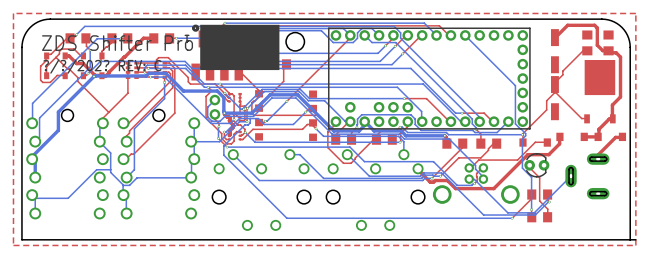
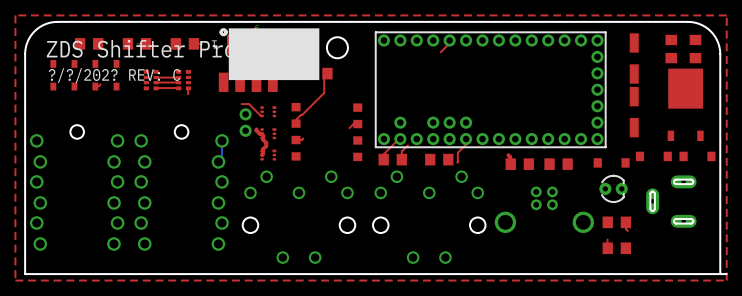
bottom track: (224, 23) (424, 23) (436, 35) -> none
top track: (76, 34) (73, 37) (66, 38) (50, 54) (48, 54) (46, 60) (40, 66) (40, 80) (42, 82) (50, 82) (57, 75) (65, 75) -> none
bottom track: (76, 34) (84, 26) (394, 26) (400, 32) (400, 38) (479, 116) (479, 121) -> none
via: (76, 34) -> none
top track: (350, 35) (349, 38) (286, 101) -> none
bottom track: (350, 35) (343, 28) (230, 28) (221, 38) (176, 38) -> none
bottom track: (364, 35) (372, 42) (395, 42) (472, 119) (472, 123) (476, 129) -> none
bottom track: (379, 35) (372, 28) (361, 28) (353, 42) (333, 42) (321, 30) (231, 30) (202, 60) (202, 65) -> none
top track: (407, 35) (395, 46) -> none
top track: (422, 35) (402, 53) -> none
top track: (450, 35) (439, 25) (236, 25) (231, 30) (231, 38) -> none
bottom track: (465, 35) (515, 85) (515, 123) (525, 133) (522, 139) (522, 168) (531, 177) (531, 209) -> none
top track: (554, 37) (567, 25) (594, 25) (597, 28) (597, 45) (602, 50) (616, 52) (620, 57) (620, 96) (612, 105) (612, 118) (609, 119) (598, 129) (598, 136) (584, 136) -> none
top track: (85, 38) (86, 46) (90, 50) -> none
top track: (111, 38) (111, 42) (102, 51) (100, 61) -> none
bottom track: (120, 38) (97, 38) (32, 103) (32, 123) -> none
top track: (153, 38) (143, 38) (105, 75) (95, 75) -> none
bottom track: (385, 45) (377, 53) (212, 53) (209, 56) (209, 61) -> none
via: (385, 45) -> none
bottom track: (395, 46) (380, 61) (227, 61) -> none
via: (395, 46) -> none
bottom track: (90, 50) (90, 67) (39, 118) (39, 137) (35, 141) -> none
via: (90, 50) -> none
top track: (587, 50) (582, 51) (562, 71) (562, 74) (554, 84) -> none
bottom track: (402, 53) (392, 64) (226, 64) (218, 57) (213, 57) -> none
via: (402, 53) -> none
top track: (65, 55) (69, 56) (76, 63) (83, 63) (95, 75) -> none
top track: (83, 55) (81, 56) (74, 49) (61, 49) (46, 66) (46, 75) -> none
top track: (55, 57) (77, 77) (77, 81) (108, 112) -> none
top track: (128, 62) (127, 93) (103, 118) (102, 123) -> none
top track: (136, 62) (155, 63) (158, 57) (168, 57) (188, 77) (190, 84) (215, 84) (229, 97) -> none
top track: (164, 62) (169, 63) (174, 68) (174, 113) (133, 154) (123, 159) -> none
top track: (164, 67) (169, 67) (172, 71) (172, 87) (129, 130) (126, 136) (126, 141) -> none
bottom track: (148, 68) (185, 68) (204, 87) (397, 87) (421, 111) (422, 121) -> none
via: (148, 68) -> none
bottom track: (144, 72) (144, 67) (147, 65) (185, 65) (204, 84) (423, 84) (460, 121) (465, 121) -> none
via: (144, 72) -> none
top track: (164, 72) (170, 73) (170, 81) (129, 122) (123, 123) -> none
top track: (238, 72) (258, 90) (258, 96) (251, 102) (251, 113) (254, 115) (317, 115) (331, 128) -> none
bottom track: (88, 73) (100, 61) (185, 61) (192, 68) (410, 68) (455, 113) (462, 113) -> none
via: (88, 73) -> none
via: (93, 76) -> none
bottom track: (150, 77) (164, 77) (210, 123) (230, 123) (234, 119) -> none
via: (150, 77) -> none
bottom track: (164, 82) (164, 98) (134, 128) (134, 169) (126, 177) -> none
via: (164, 82) -> none
top track: (220, 84) (228, 94) (234, 95) (234, 112) (240, 117) -> none
via: (220, 84) -> none
top track: (554, 84) (554, 92) (546, 100) (546, 109) (522, 133) (522, 142) -> none
top track: (554, 84) (555, 92) (581, 118) (587, 118) -> none
top track: (208, 87) (211, 91) (206, 96) (206, 118) (221, 133) (221, 138) (227, 143) (231, 143) (234, 141) (234, 134) (236, 131) (240, 132) -> none
via: (208, 87) -> none
bottom track: (224, 93) (241, 109) (243, 109) (262, 89) (300, 89) (309, 98) (404, 98) -> none
via: (224, 93) -> none
top track: (240, 94) (240, 113) -> none
top track: (404, 98) (426, 98) (450, 121) -> none
via: (404, 98) -> none
bottom track: (214, 100) (207, 107) (207, 116) (212, 121) (220, 121) (224, 116) (253, 116) (271, 98) (296, 98) (332, 134) (399, 134) (404, 139) (449, 139) (475, 165) (475, 169) (483, 179) -> none
bottom track: (286, 101) (265, 121) -> none
via: (286, 101) -> none
top track: (240, 106) (247, 108) -> none
top track: (247, 108) (247, 121) -> none
bottom track: (247, 108) (264, 91) (299, 91) (308, 100) (324, 100) (345, 121) (350, 121) -> none
via: (247, 108) -> none
top track: (243, 109) (244, 119) (240, 120) -> none
via: (243, 109) -> none
bottom track: (305, 112) (293, 124) (264, 124) (258, 118) (239, 118) (224, 132) -> none
via: (305, 112) -> none
via: (224, 113) -> none
top track: (229, 113) (234, 115) (234, 121) (244, 129) (244, 132) -> none
top track: (462, 113) (484, 113) (494, 121) -> none
via: (462, 113) -> none
top track: (214, 114) (214, 119) (219, 123) (219, 126) -> none
bottom track: (250, 118) (250, 122) (244, 125) (223, 146) (223, 155) (286, 218) (512, 218) -> none
via: (234, 119) -> none
bottom track: (247, 121) (239, 121) (219, 141) (191, 141) (194, 142) (194, 159) (191, 161) (190, 177) (137, 177) (129, 185) (123, 185) -> none
via: (247, 121) -> none
via: (265, 121) -> none
top track: (335, 121) (327, 132) (327, 147) (343, 163) (351, 163) (373, 140) (376, 140) (376, 135) (381, 130) (396, 130) (400, 127) -> none
bottom track: (508, 121) (497, 132) (421, 130) (415, 124) (415, 119) (410, 114) (361, 114) (357, 119) (356, 127) -> none
bottom track: (102, 123) (99, 126) (99, 142) (110, 153) (110, 172) (123, 184) (123, 194) (126, 198) (126, 213) -> none
top track: (311, 124) (307, 124) (302, 129) (252, 129) (242, 139) (240, 139) -> none
top track: (311, 124) (316, 128) -> none
bottom track: (219, 126) (218, 138) -> none
via: (219, 126) -> none
via: (356, 127) -> none
bottom track: (400, 127) (407, 132) (522, 134) -> none
via: (400, 127) -> none
bottom track: (316, 128) (323, 136) (398, 136) (403, 141) (403, 154) -> none
via: (316, 128) -> none
top track: (476, 129) (480, 134) (480, 143) -> none
top track: (224, 132) (224, 137) (229, 139) -> none
via: (224, 132) -> none
top track: (244, 132) (240, 135) -> none
bottom track: (245, 132) (255, 142) (400, 142) -> none
via: (245, 132) -> none
via: (522, 134) -> none
bottom track: (444, 135) (406, 135) (401, 130) (374, 130) (364, 121) (365, 124) (359, 130) (333, 130) (297, 94) (270, 94) (251, 113) (224, 113) (223, 97) (217, 91) (183, 91) (165, 73) (148, 73) (146, 75) (95, 75) (58, 112) (58, 130) (33, 155) (35, 177) -> none
via: (444, 135) -> none
top track: (559, 136) (559, 143) (548, 154) (527, 154) (493, 188) (455, 188) (447, 180) (430, 182) (418, 168) -> none
top track: (622, 136) (615, 137) (598, 154) (598, 159) -> none
top track: (218, 138) (227, 147) -> none
via: (218, 138) -> none
via: (400, 142) -> none
top track: (547, 142) (535, 142) (517, 160) (478, 160) (469, 167) -> none
top track: (462, 143) (462, 147) (431, 178) -> none
top track: (496, 143) (493, 143) (480, 157) (458, 157) (440, 176) -> none
bottom track: (227, 147) (349, 147) (364, 161) (433, 161) (457, 185) (474, 183) -> none
via: (227, 147) -> none
bottom track: (233, 154) (259, 180) (422, 180) (424, 178) (431, 178) -> none
bottom track: (289, 154) (299, 154) (323, 178) (421, 178) (424, 175) (440, 176) -> none
bottom track: (347, 154) (369, 176) (420, 176) (423, 172) (441, 172) (483, 215) (535, 215) (549, 202) -> none
top track: (529, 165) (529, 168) (539, 177) (539, 201) (547, 209) (547, 217) -> none
top track: (483, 167) (476, 173) (477, 181) (474, 183) -> none
bottom track: (110, 169) (96, 169) (68, 198) (35, 198) (32, 195) (35, 198) (35, 213) -> none
via: (440, 176) -> none
bottom track: (571, 176) (534, 212) (507, 212) (474, 179) (469, 179) -> none
via: (431, 178) -> none
via: (474, 183) -> none
top track: (531, 194) (531, 198) (512, 218) -> none
via: (549, 202) -> none
via: (531, 209) -> none
via: (512, 218) -> none

